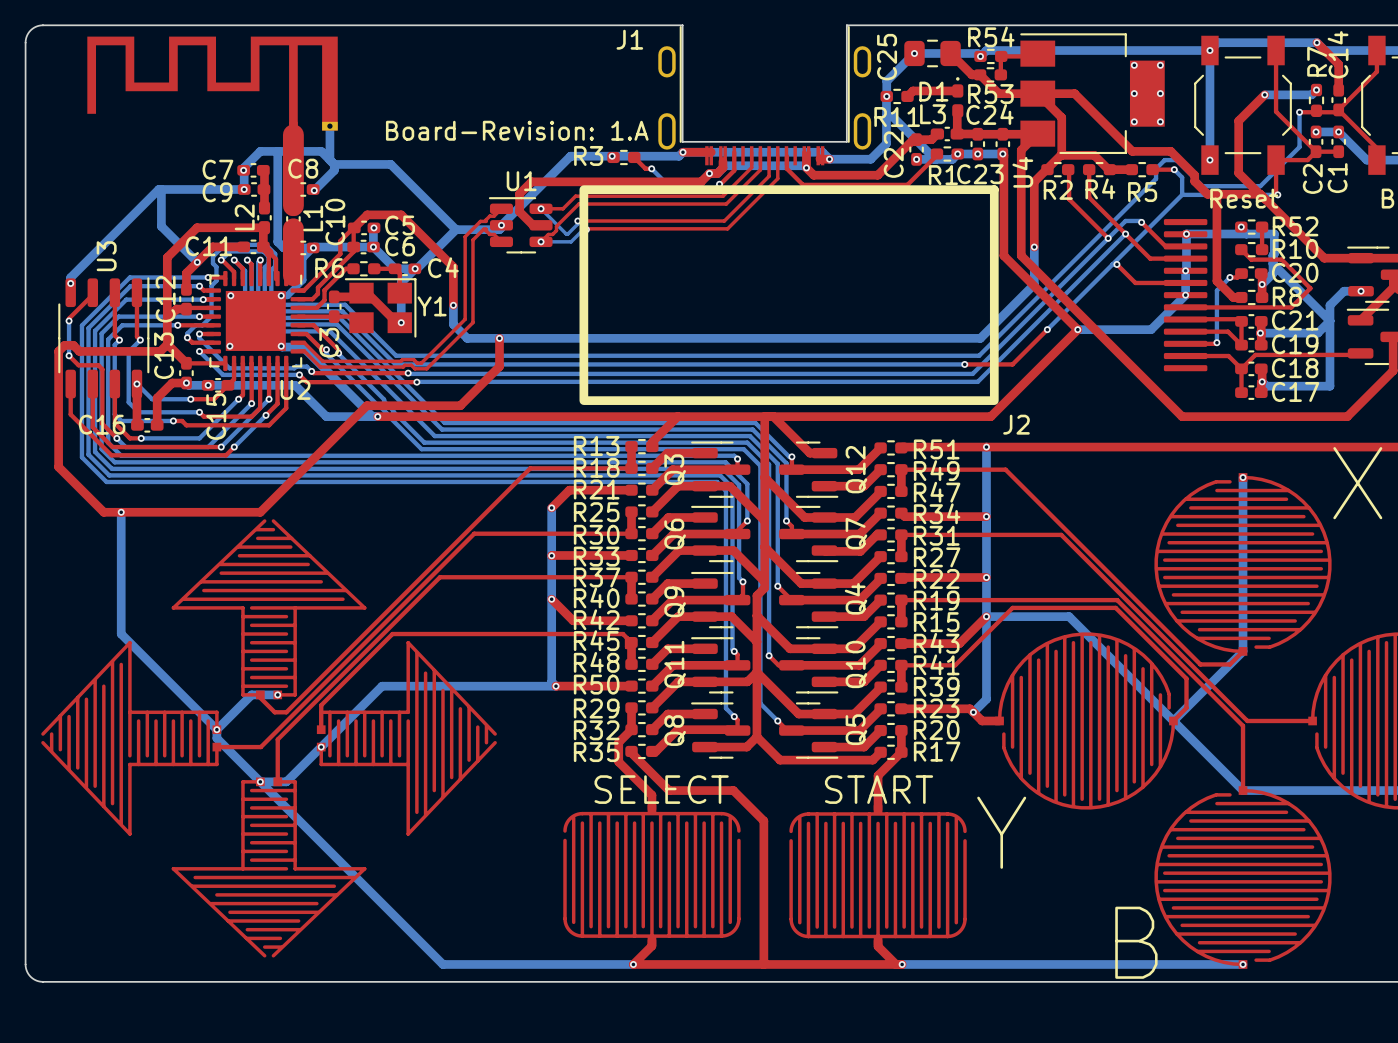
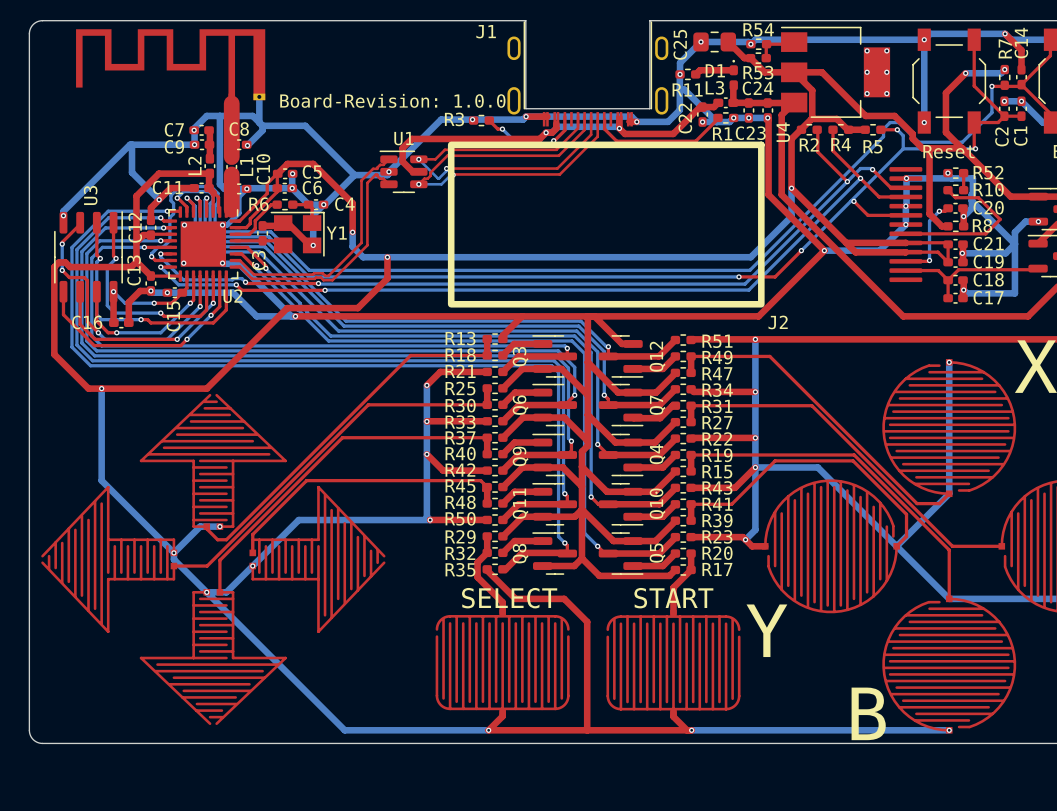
text: Board-Revision: 1.A (517, 130) -> Board-Revision: 1.0.0 (392, 100)
top track: none -> (791, 188) (855, 252) (905, 252)
top track: none -> (846, 242) (905, 242)

